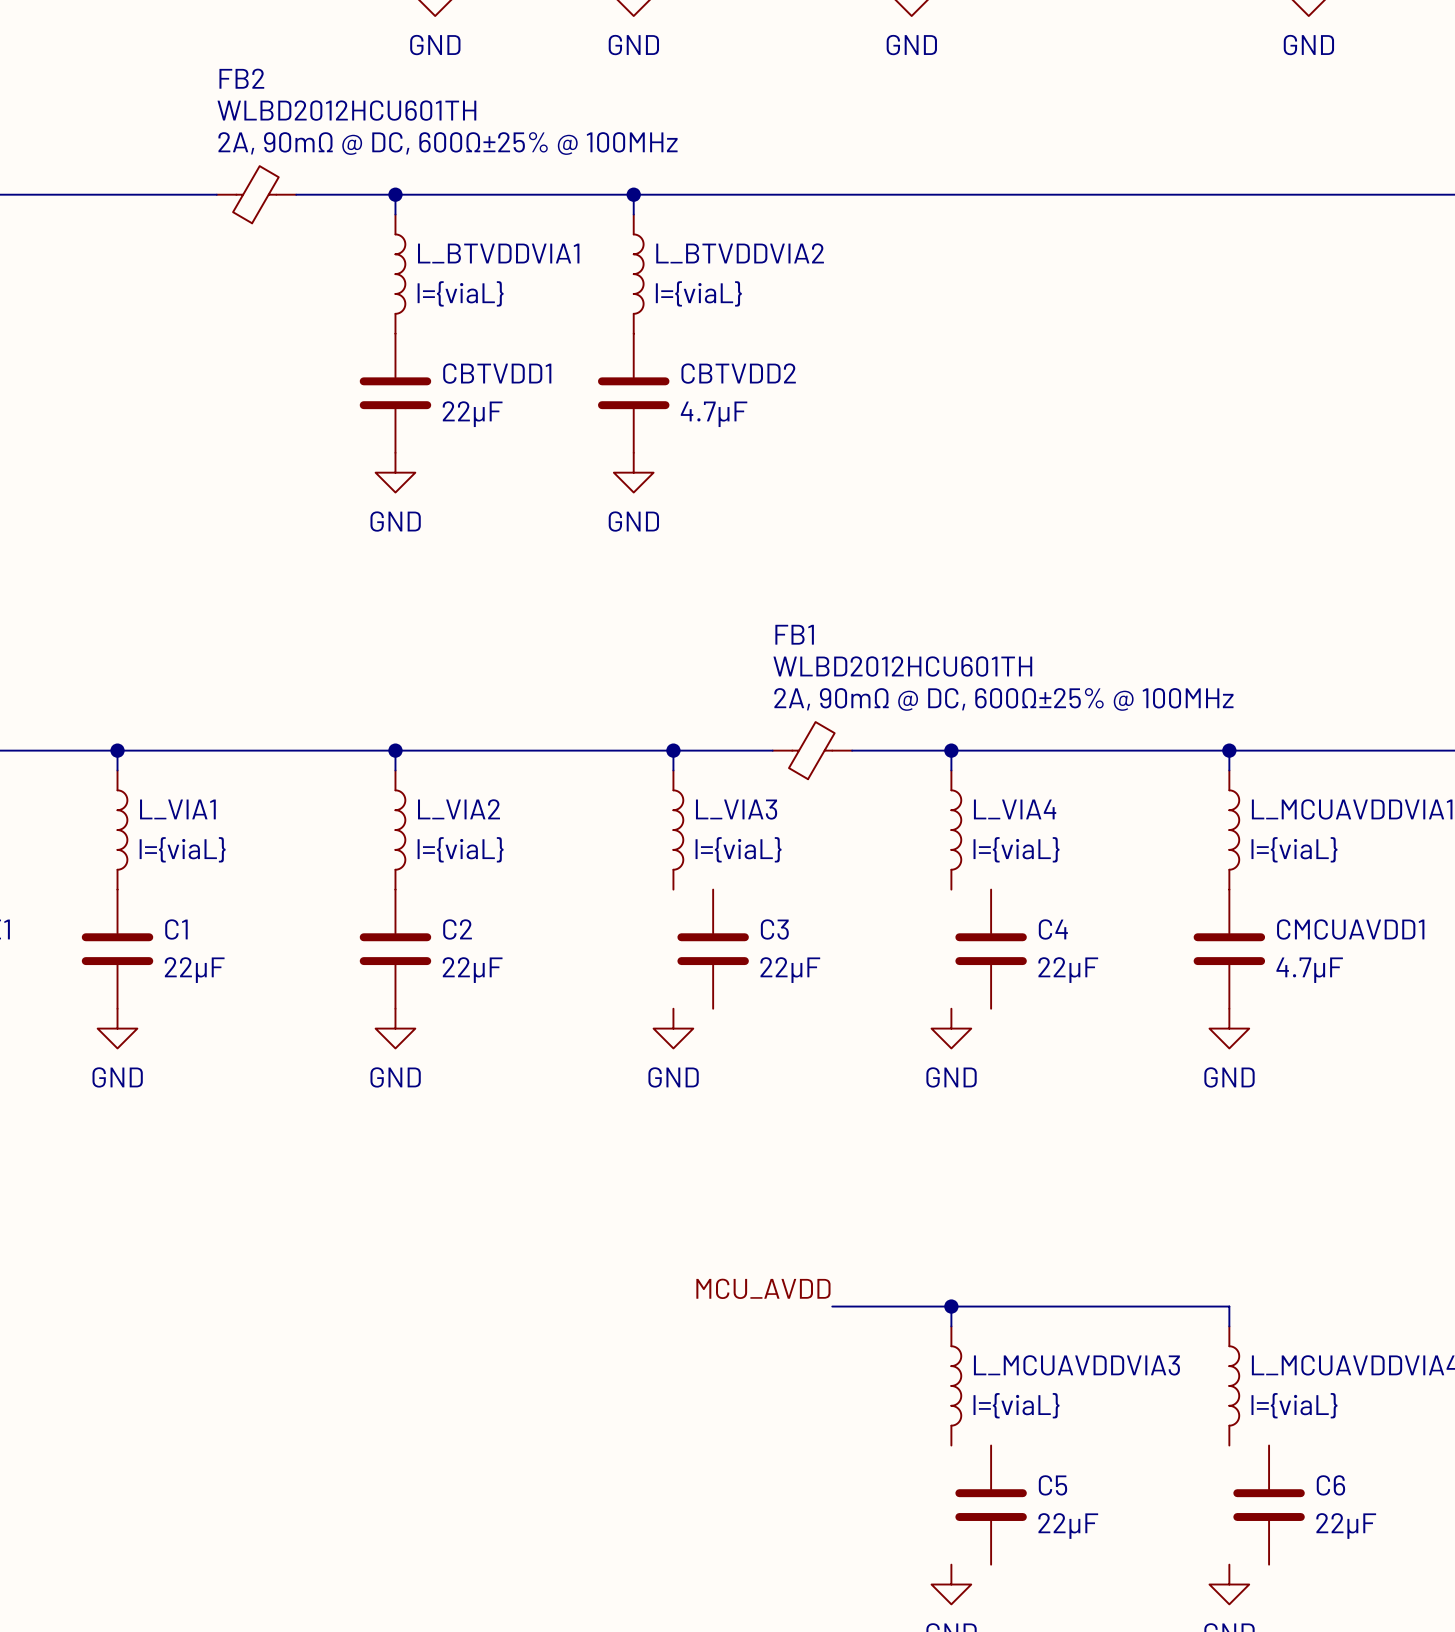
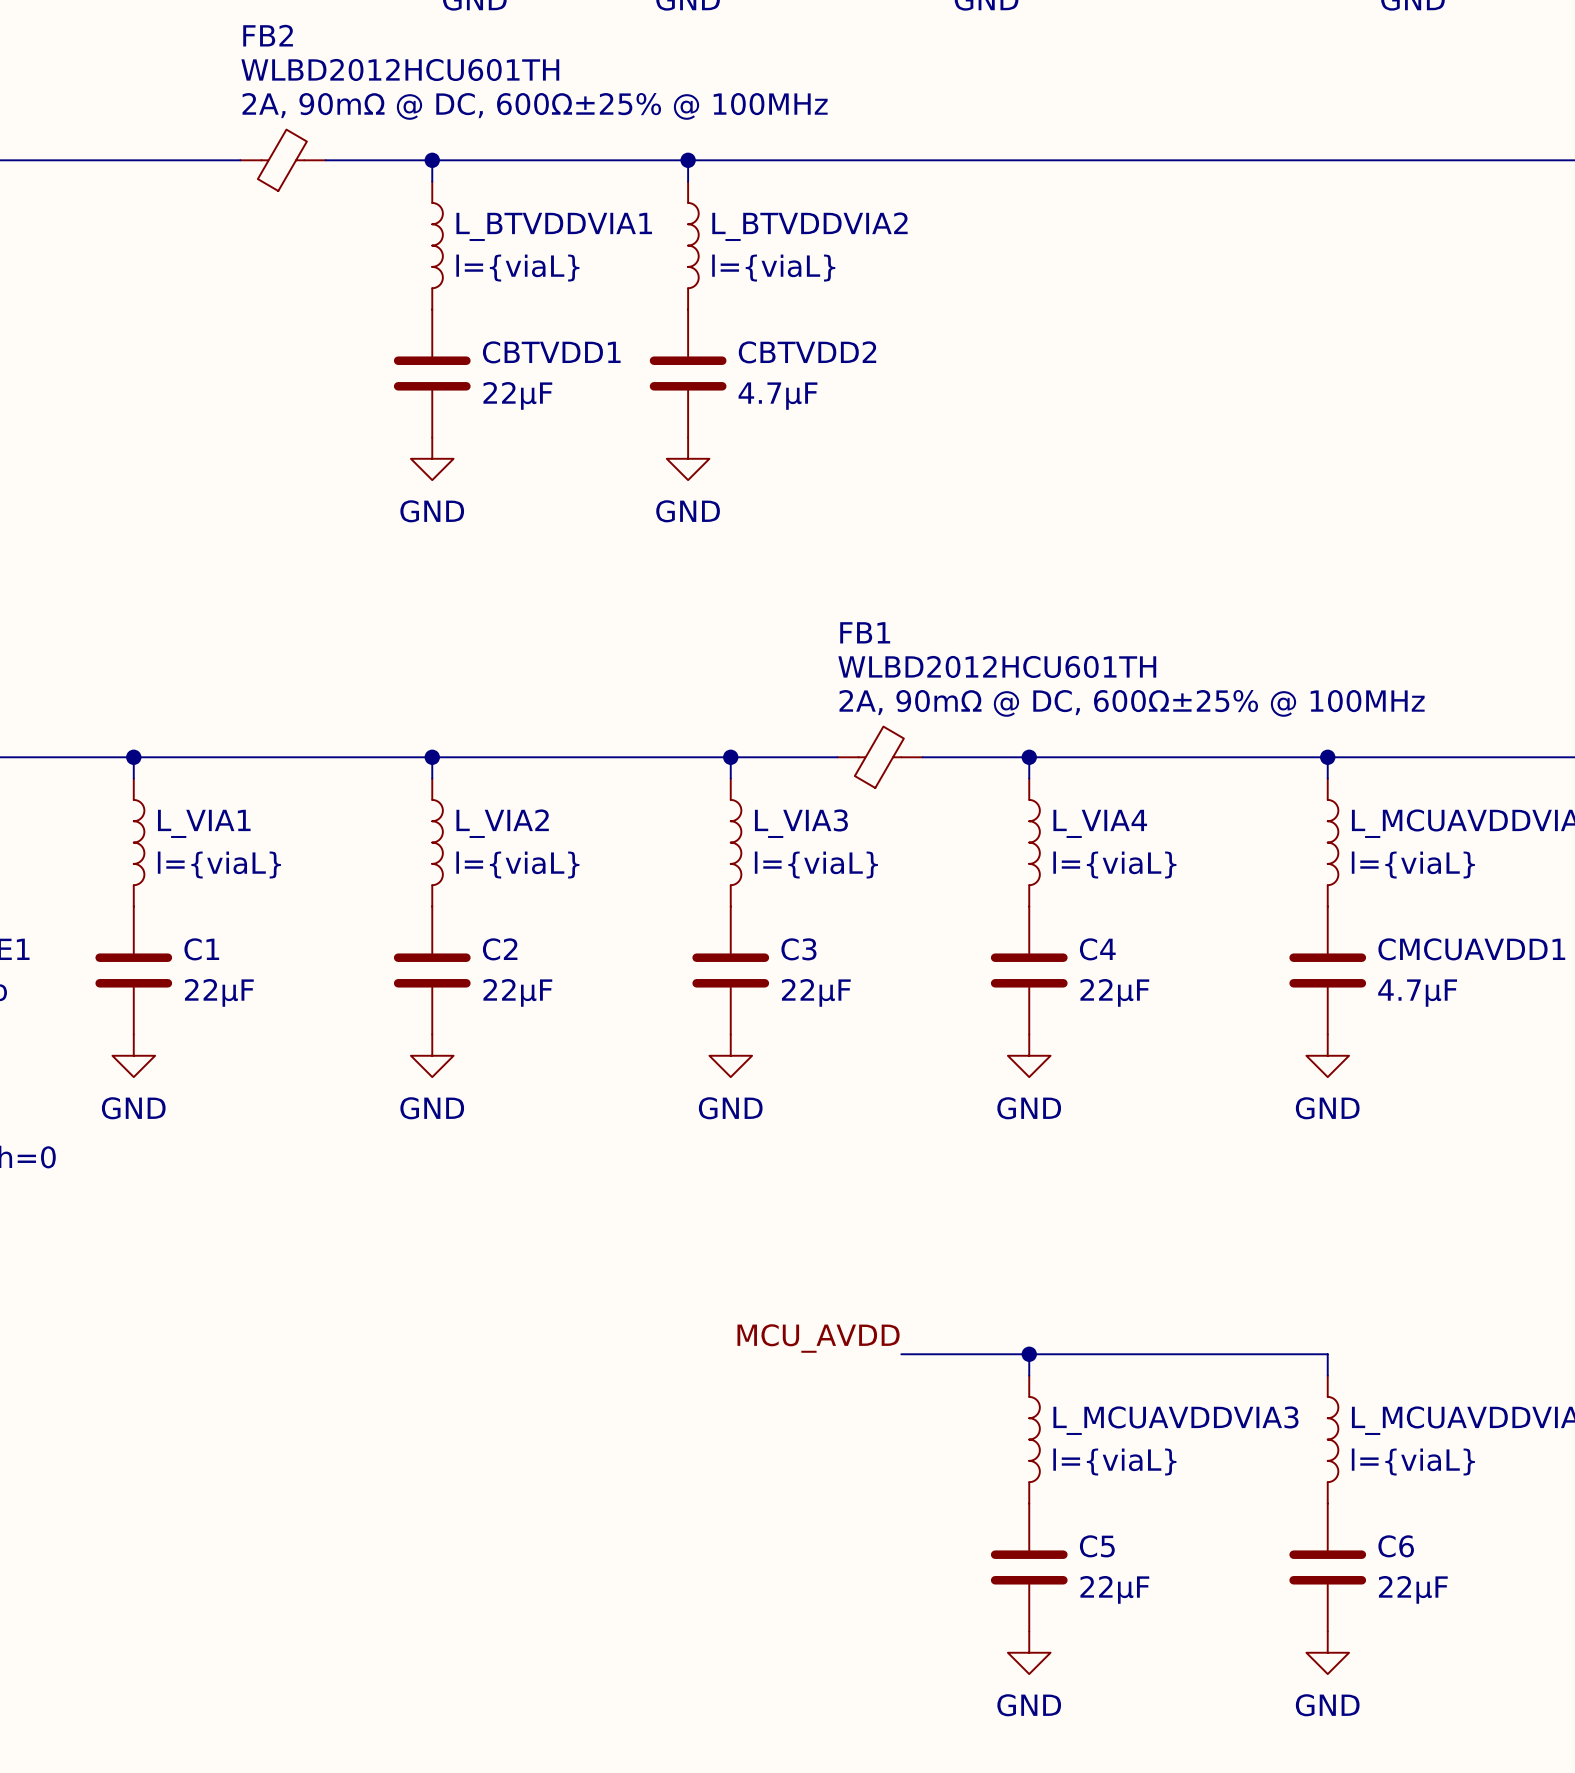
C3 position: (713, 949) -> (730, 970)
C4 position: (991, 949) -> (1029, 970)
C5 position: (991, 1505) -> (1029, 1567)
C6 position: (1269, 1505) -> (1327, 1567)

